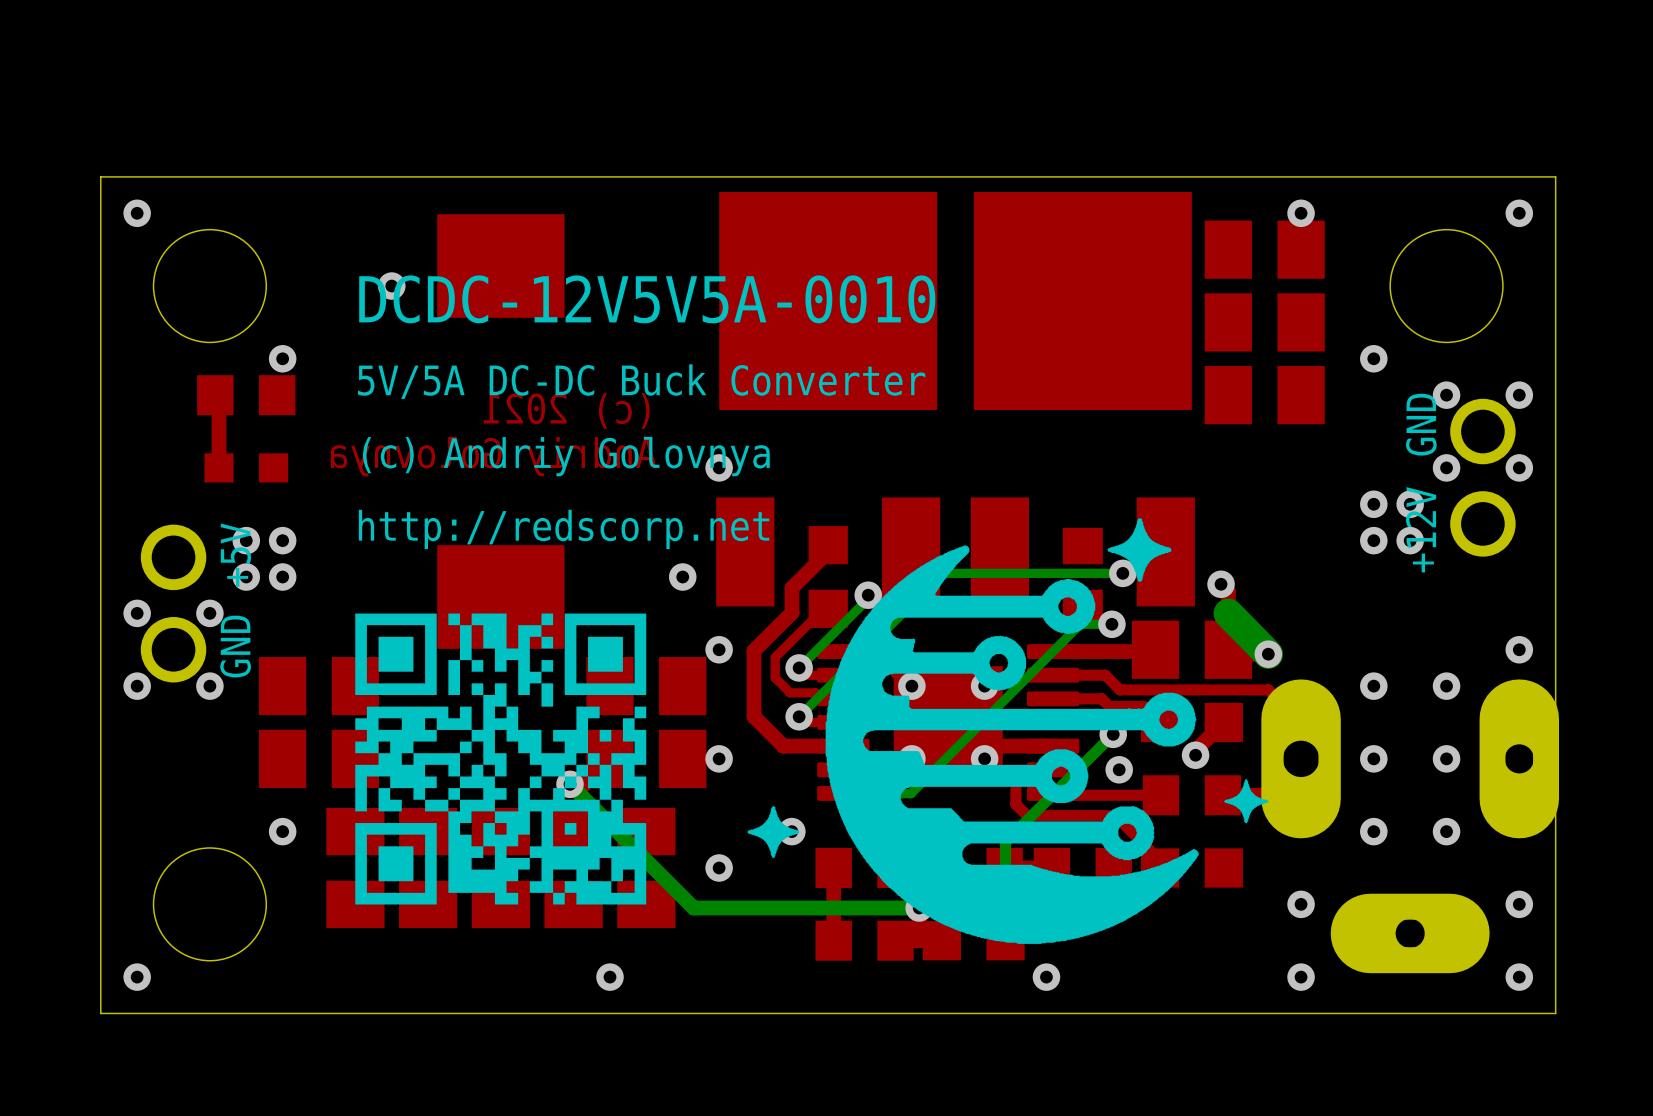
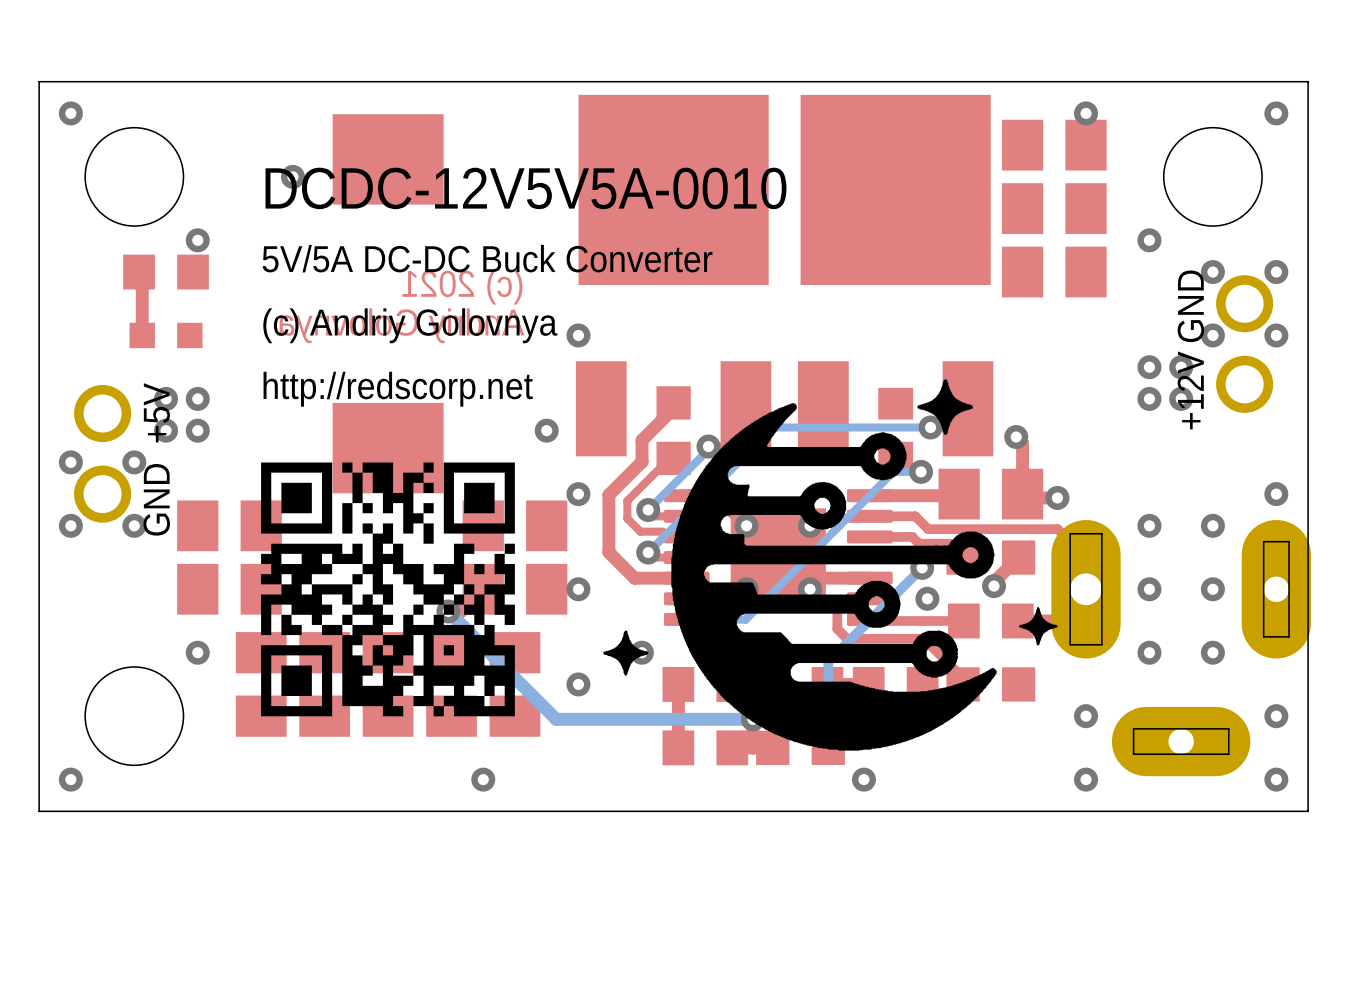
bottom track: (1228, 613) (1268, 654) -> none

